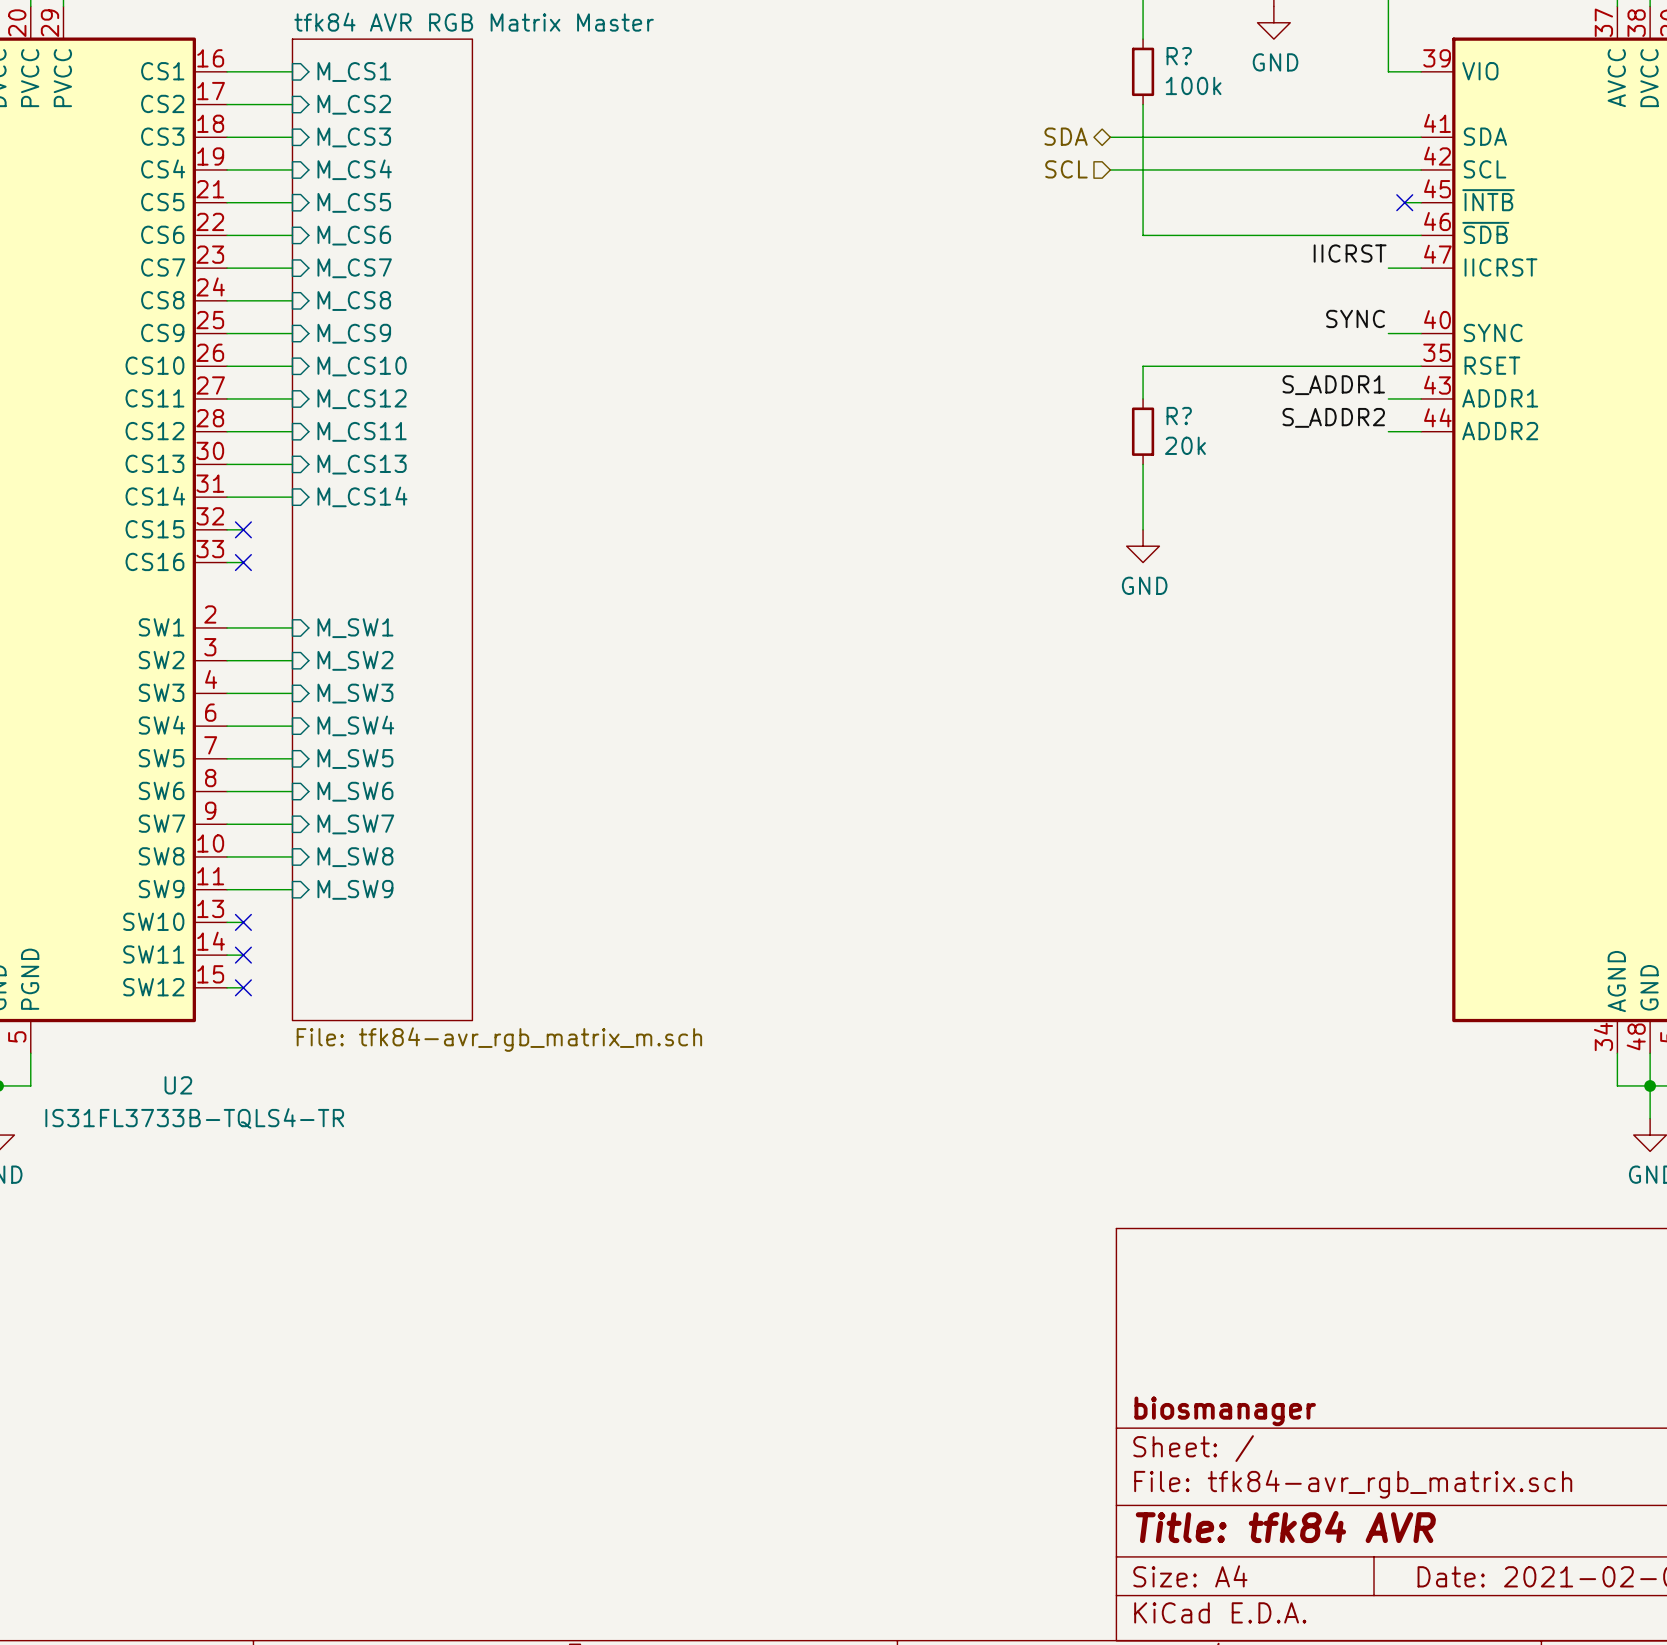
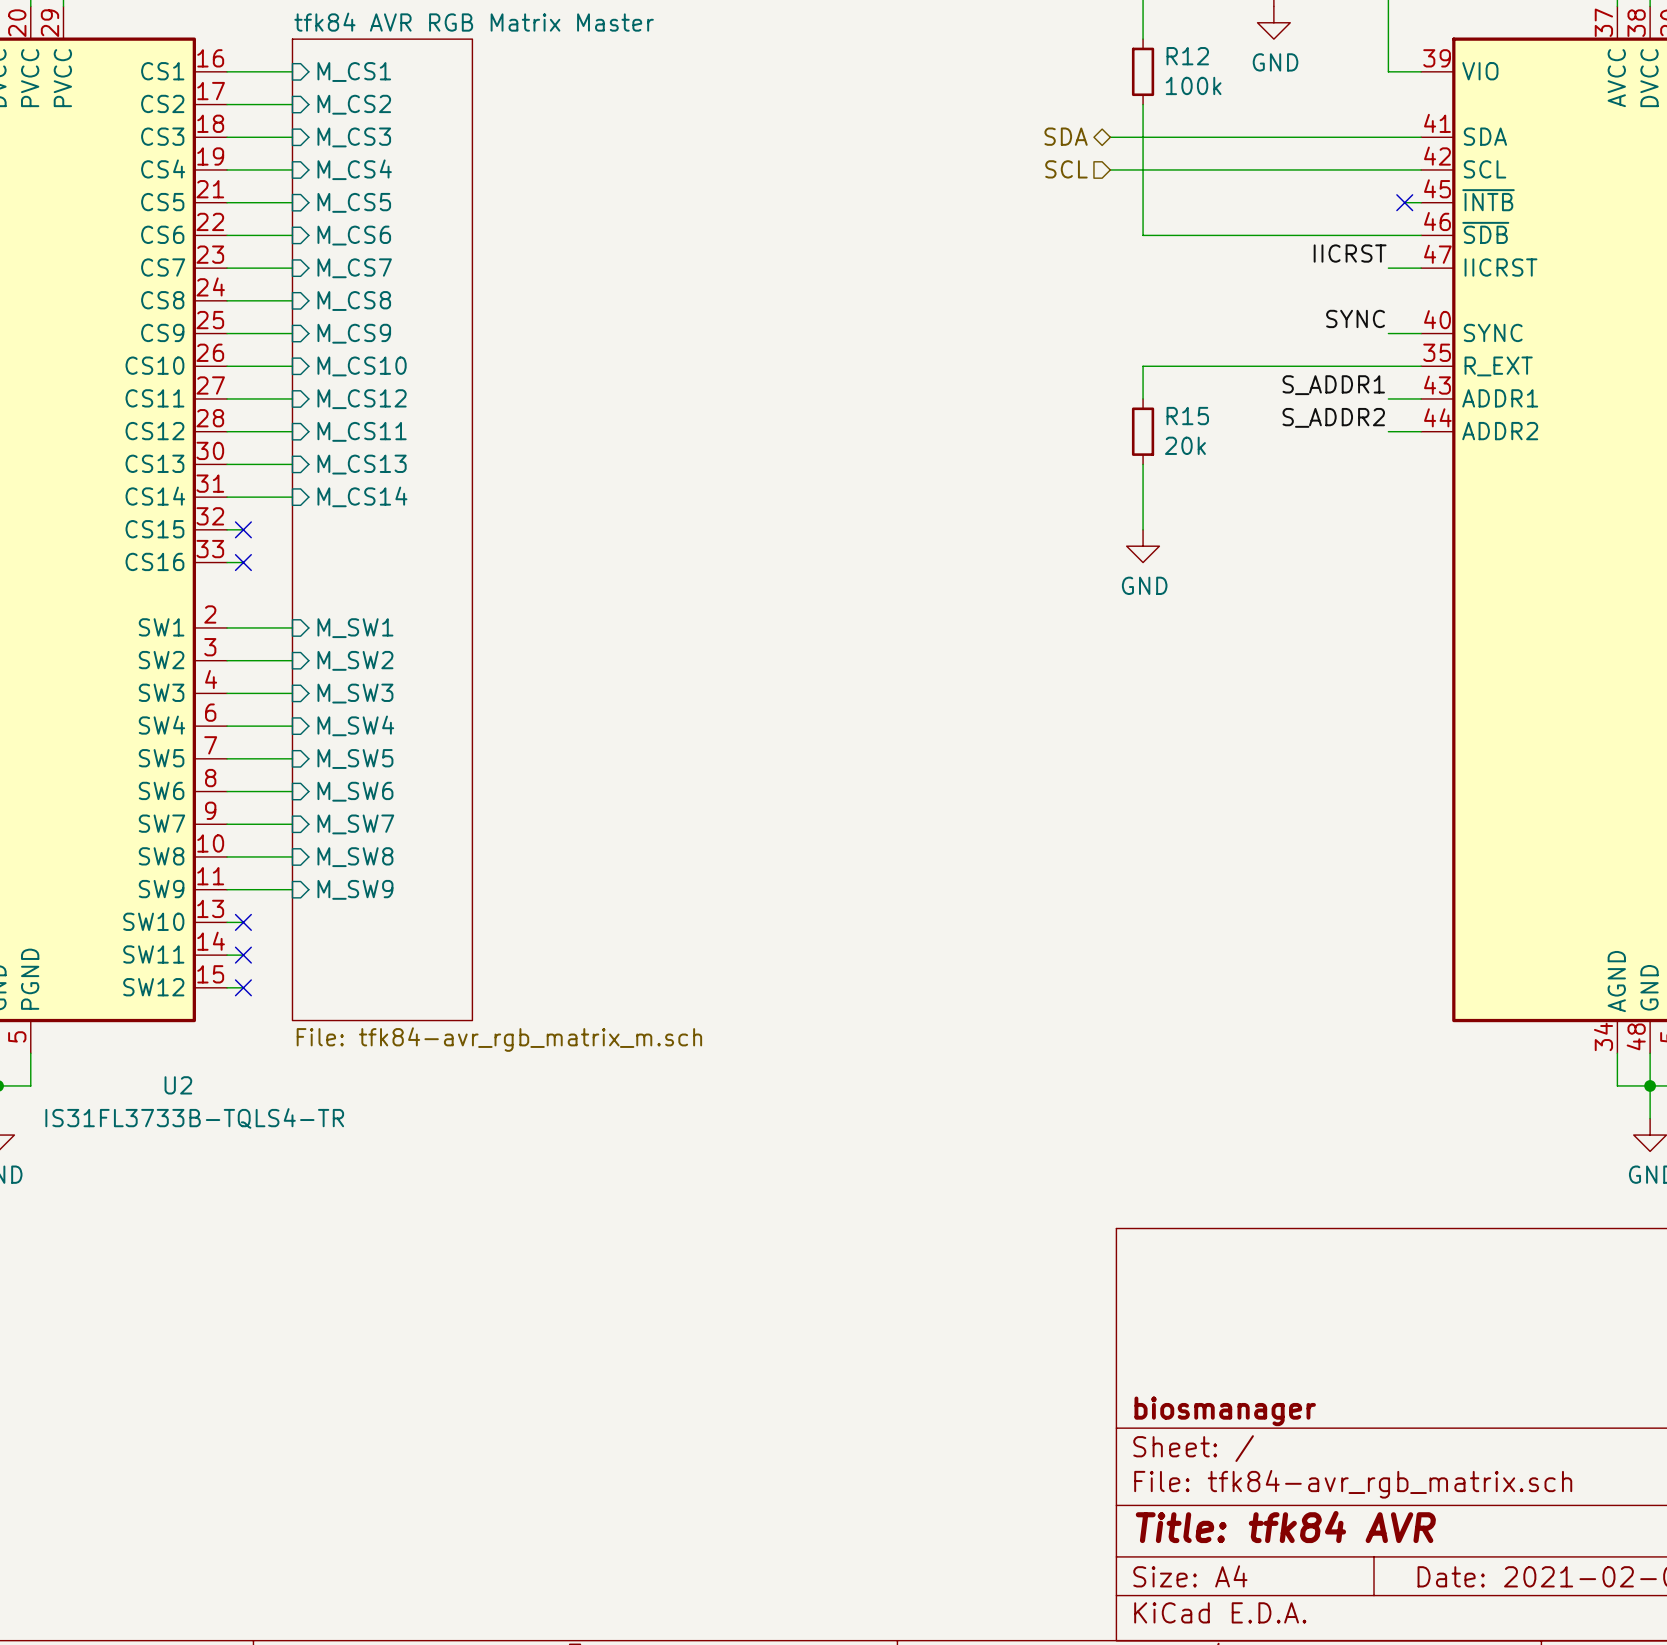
R? name: R? (1179, 56) -> R12 (1187, 56)
part pin name: RSET (1492, 365) -> R_EXT (1498, 366)
R? name: R? (1179, 416) -> R15 (1187, 416)

